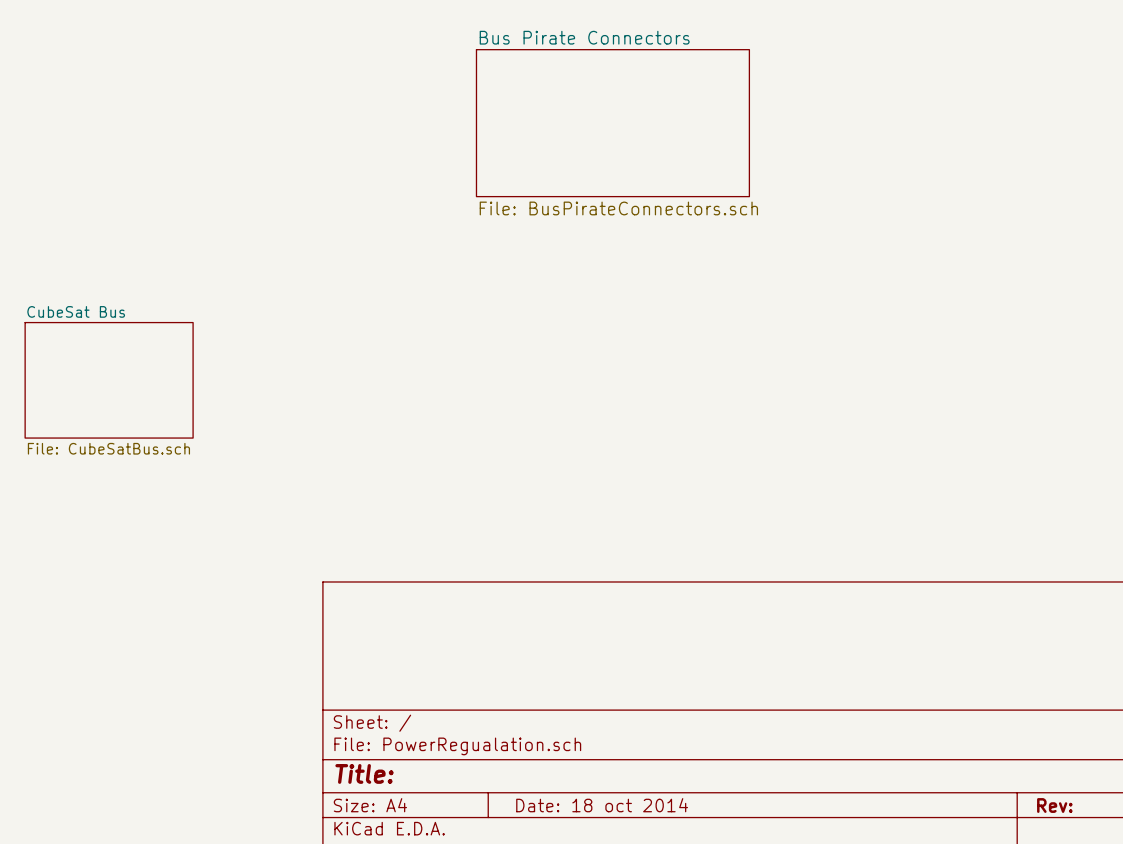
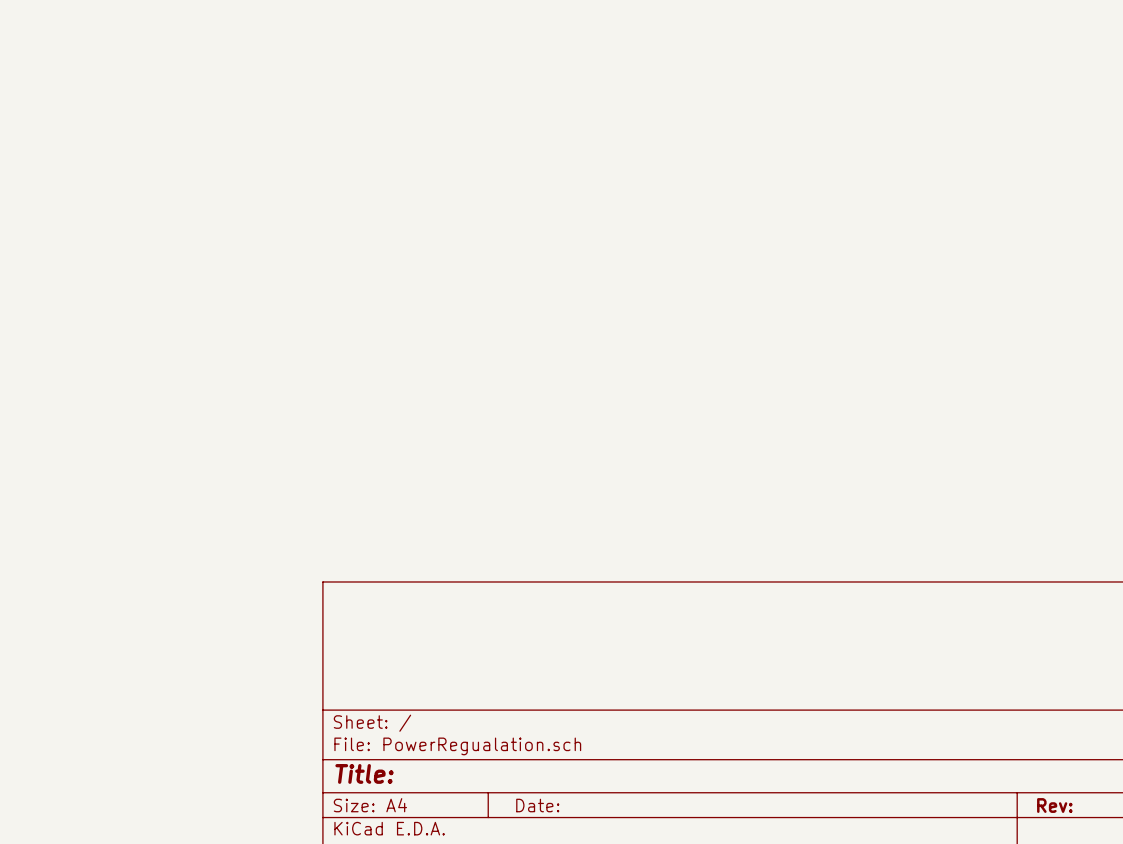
sheet Bus Pirate Connectors: File: BusPirateConnectors.sch (612, 123) -> none
sheet CubeSat Bus: File: CubeSatBus.sch (109, 380) -> none
title block: Date: 18 oct 2014 (602, 805) -> Date: (537, 805)

